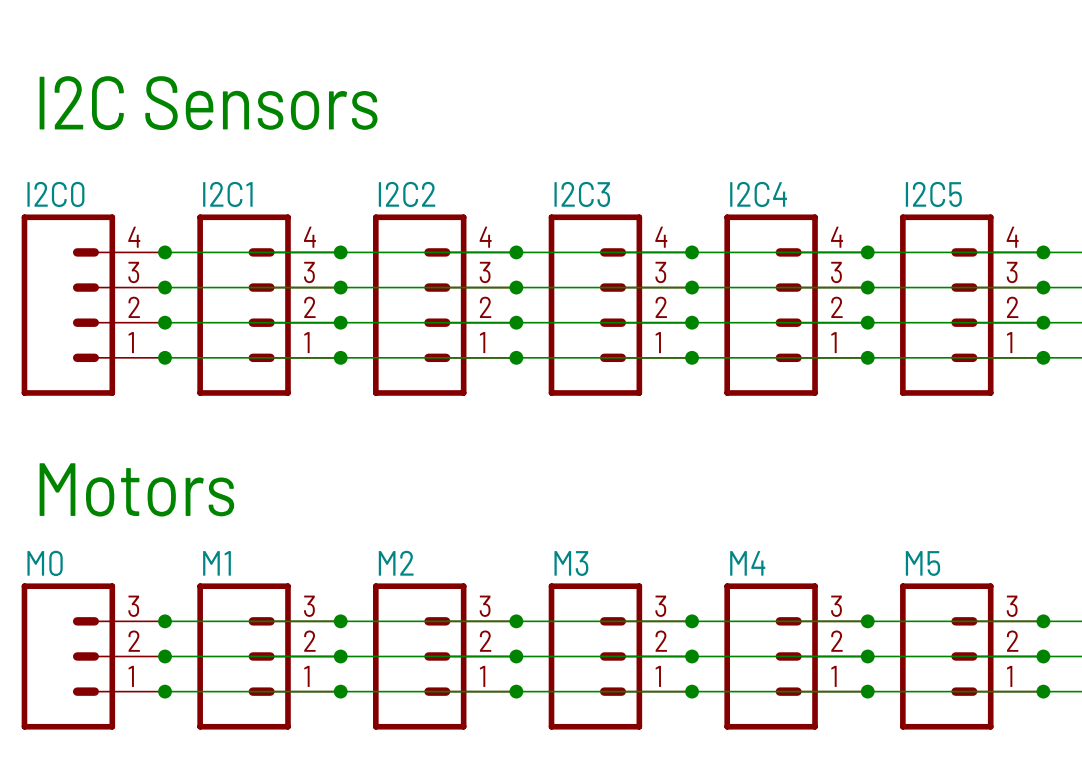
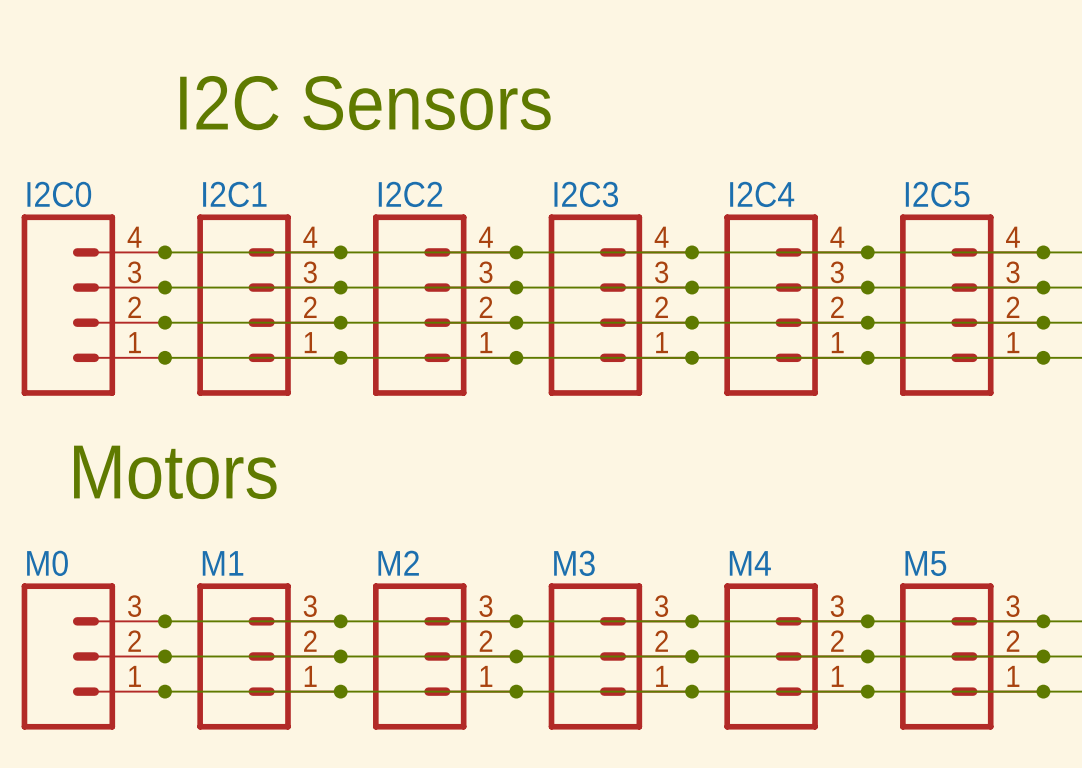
text position: I2C Sensors (208, 103) -> I2C Sensors (365, 103)
text position: Motors (136, 489) -> Motors (175, 472)

